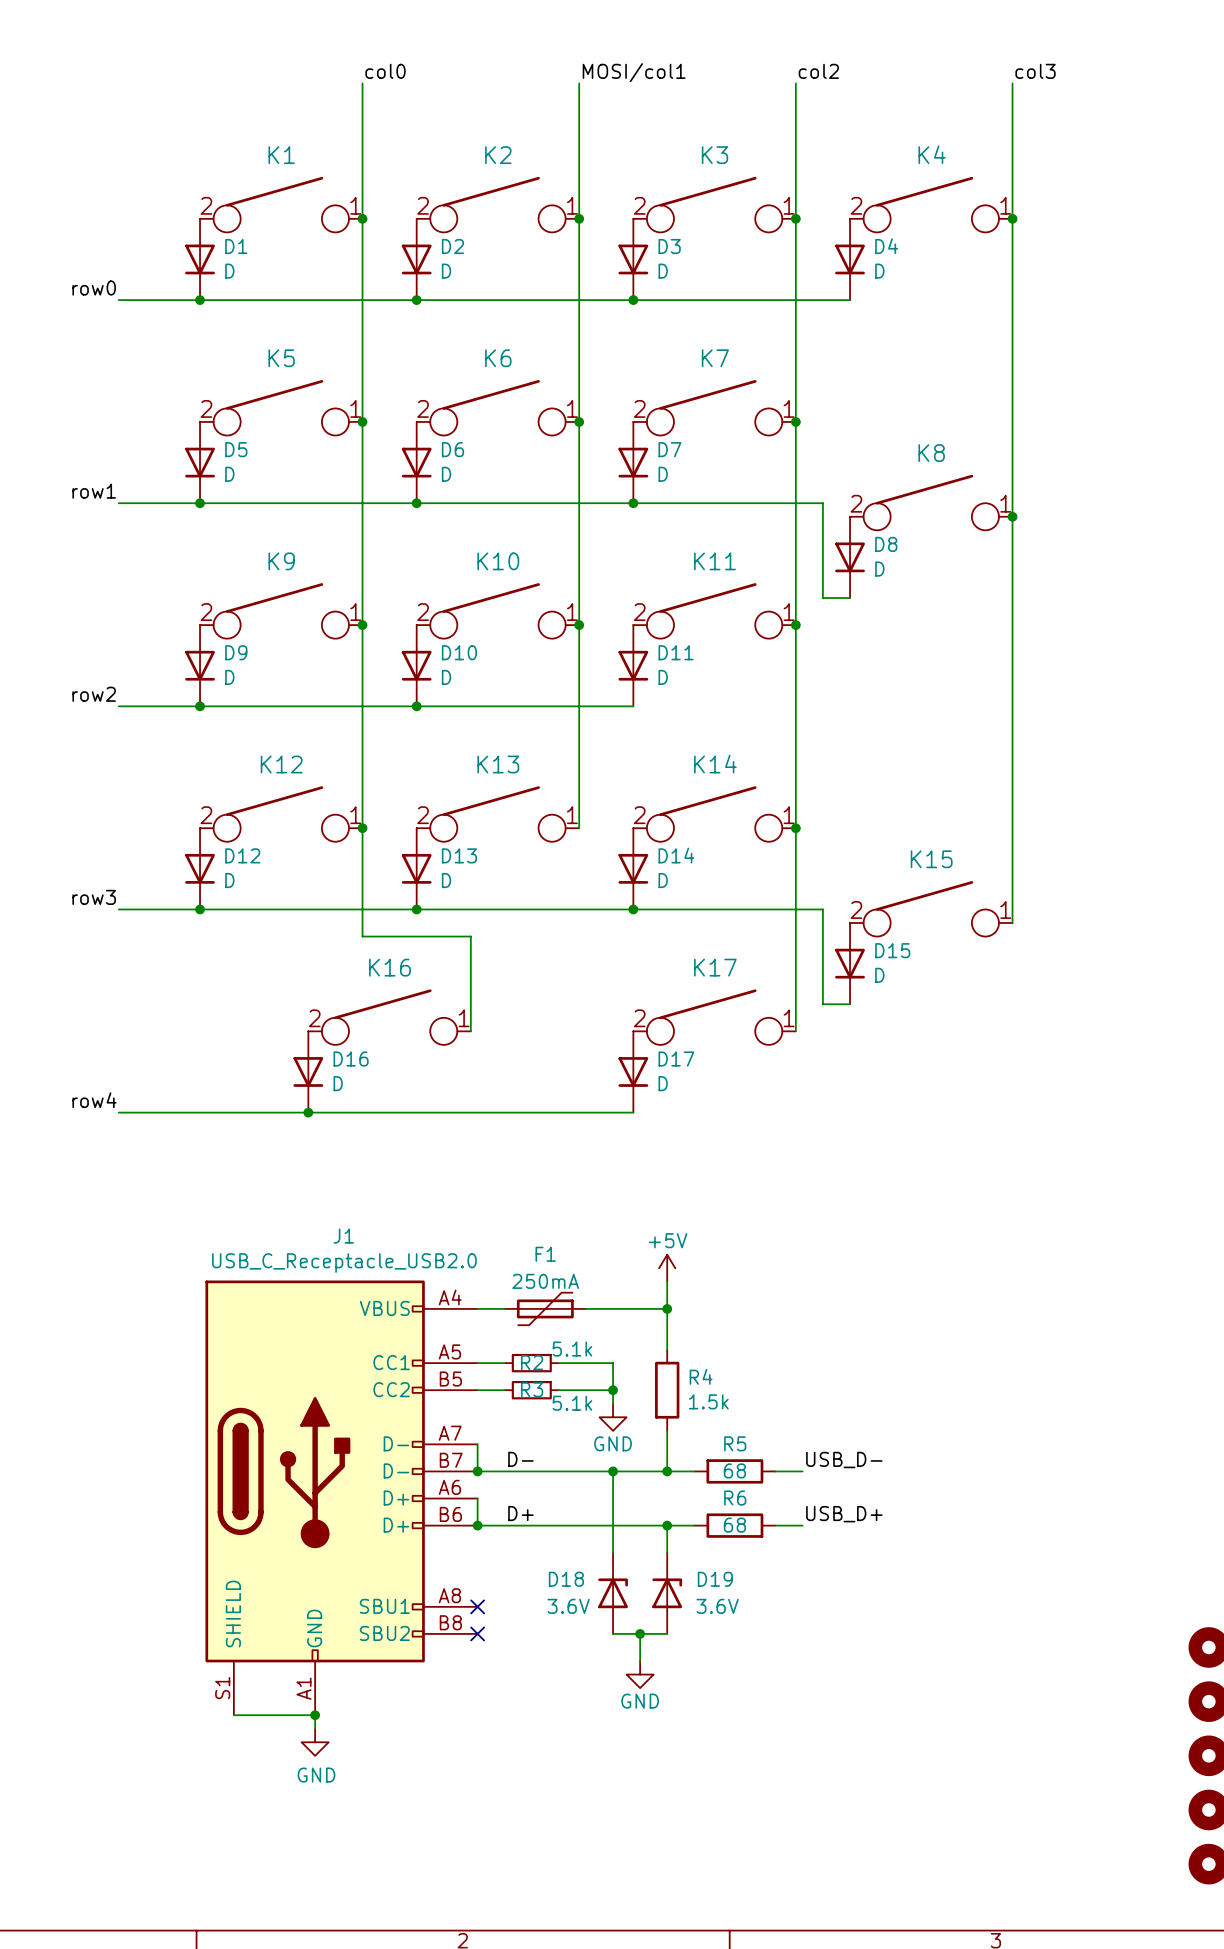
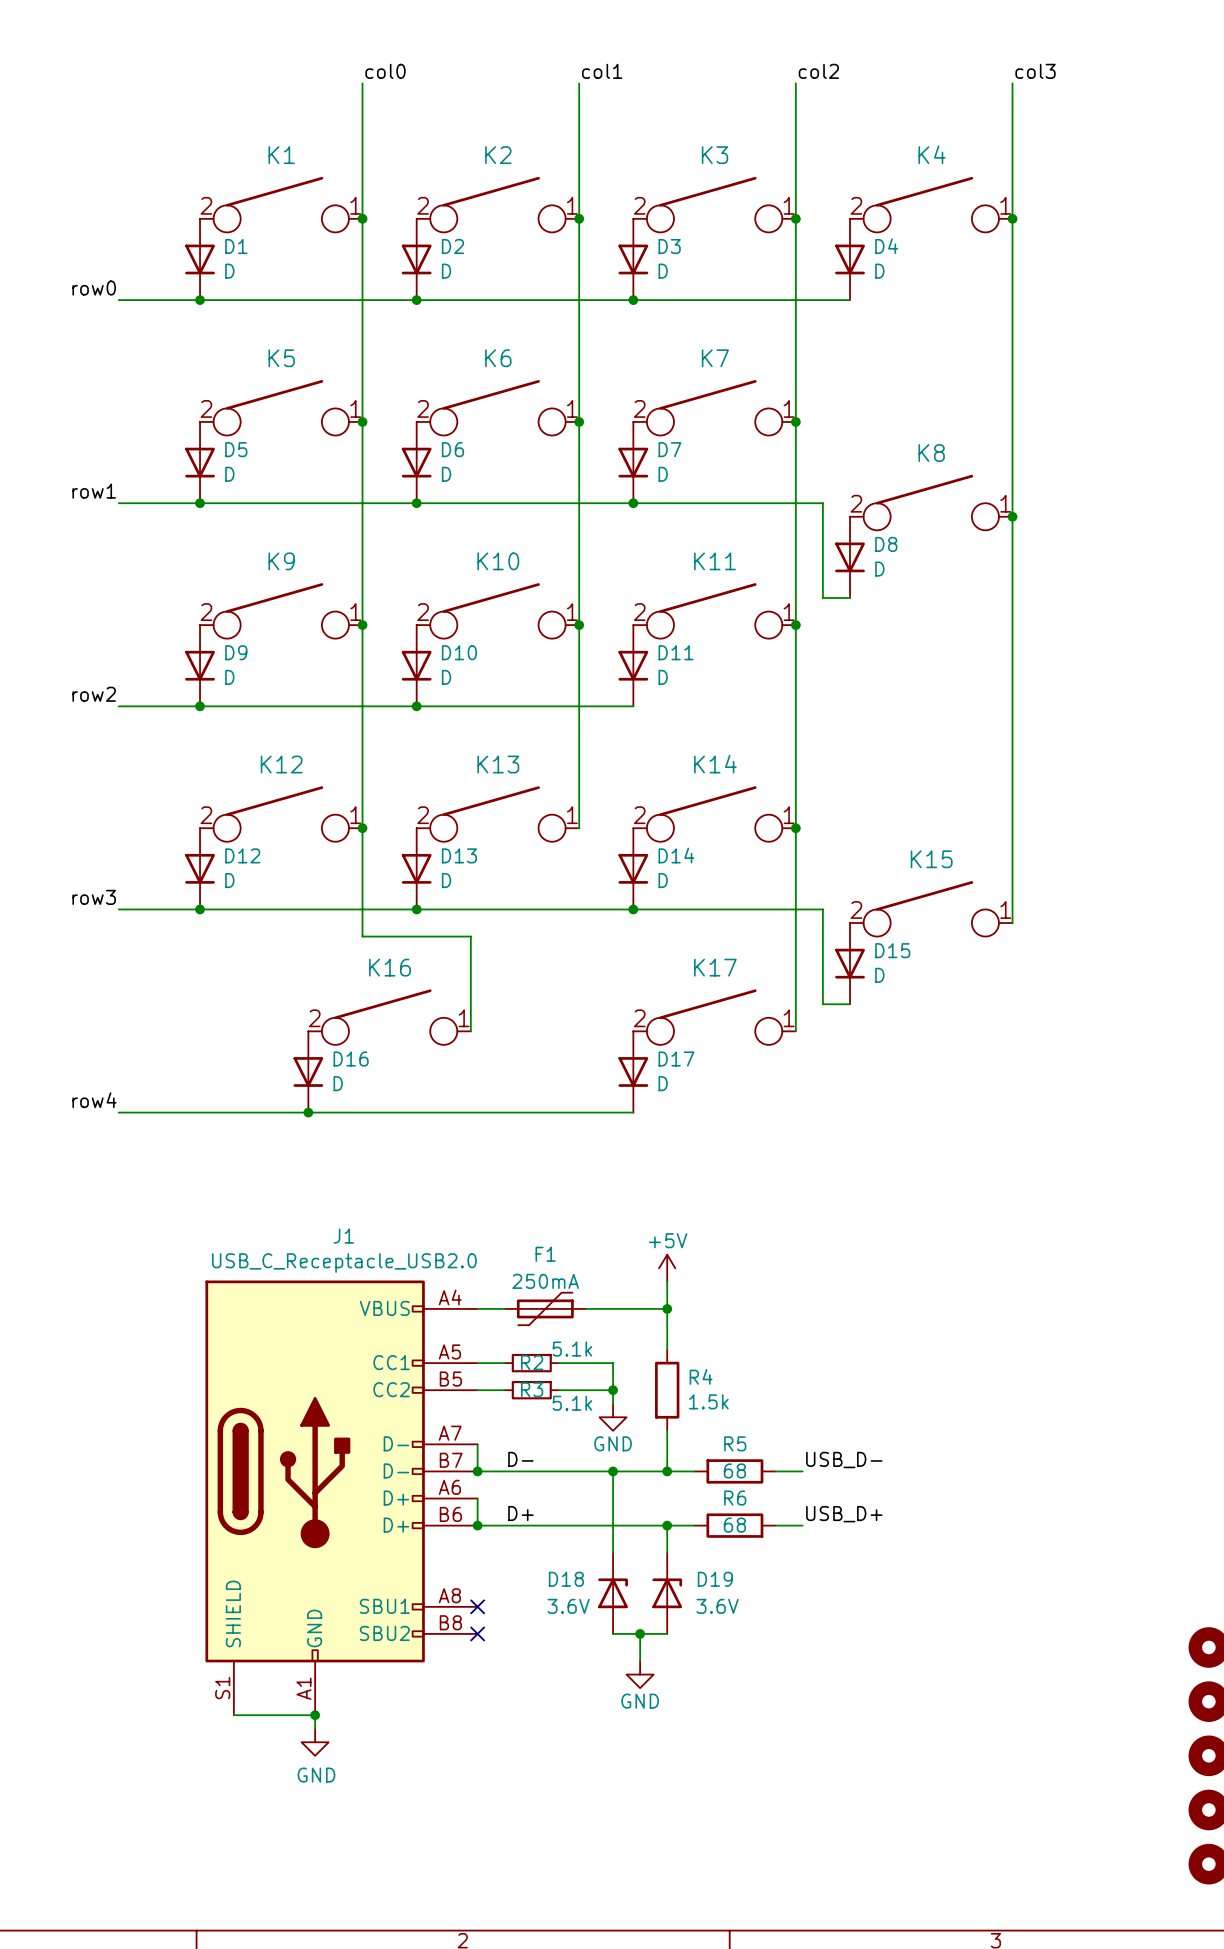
label: MOSI/col1 (634, 72) -> col1 (602, 71)

